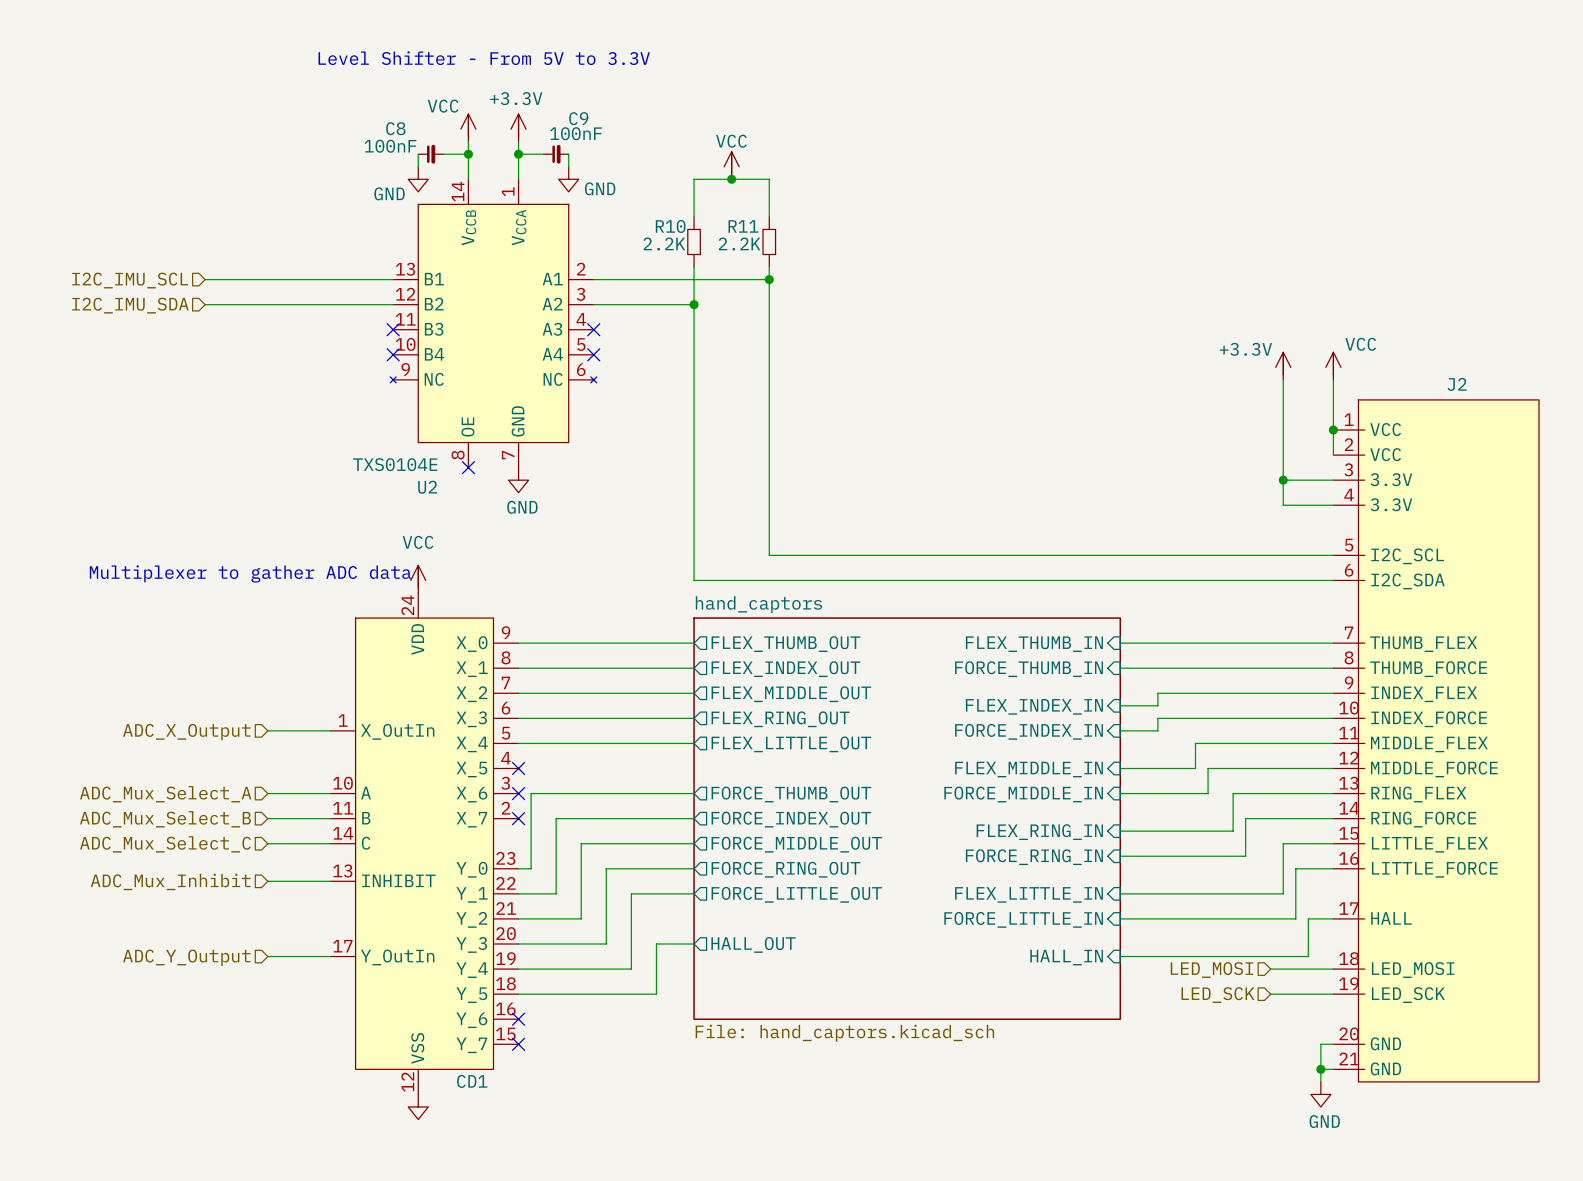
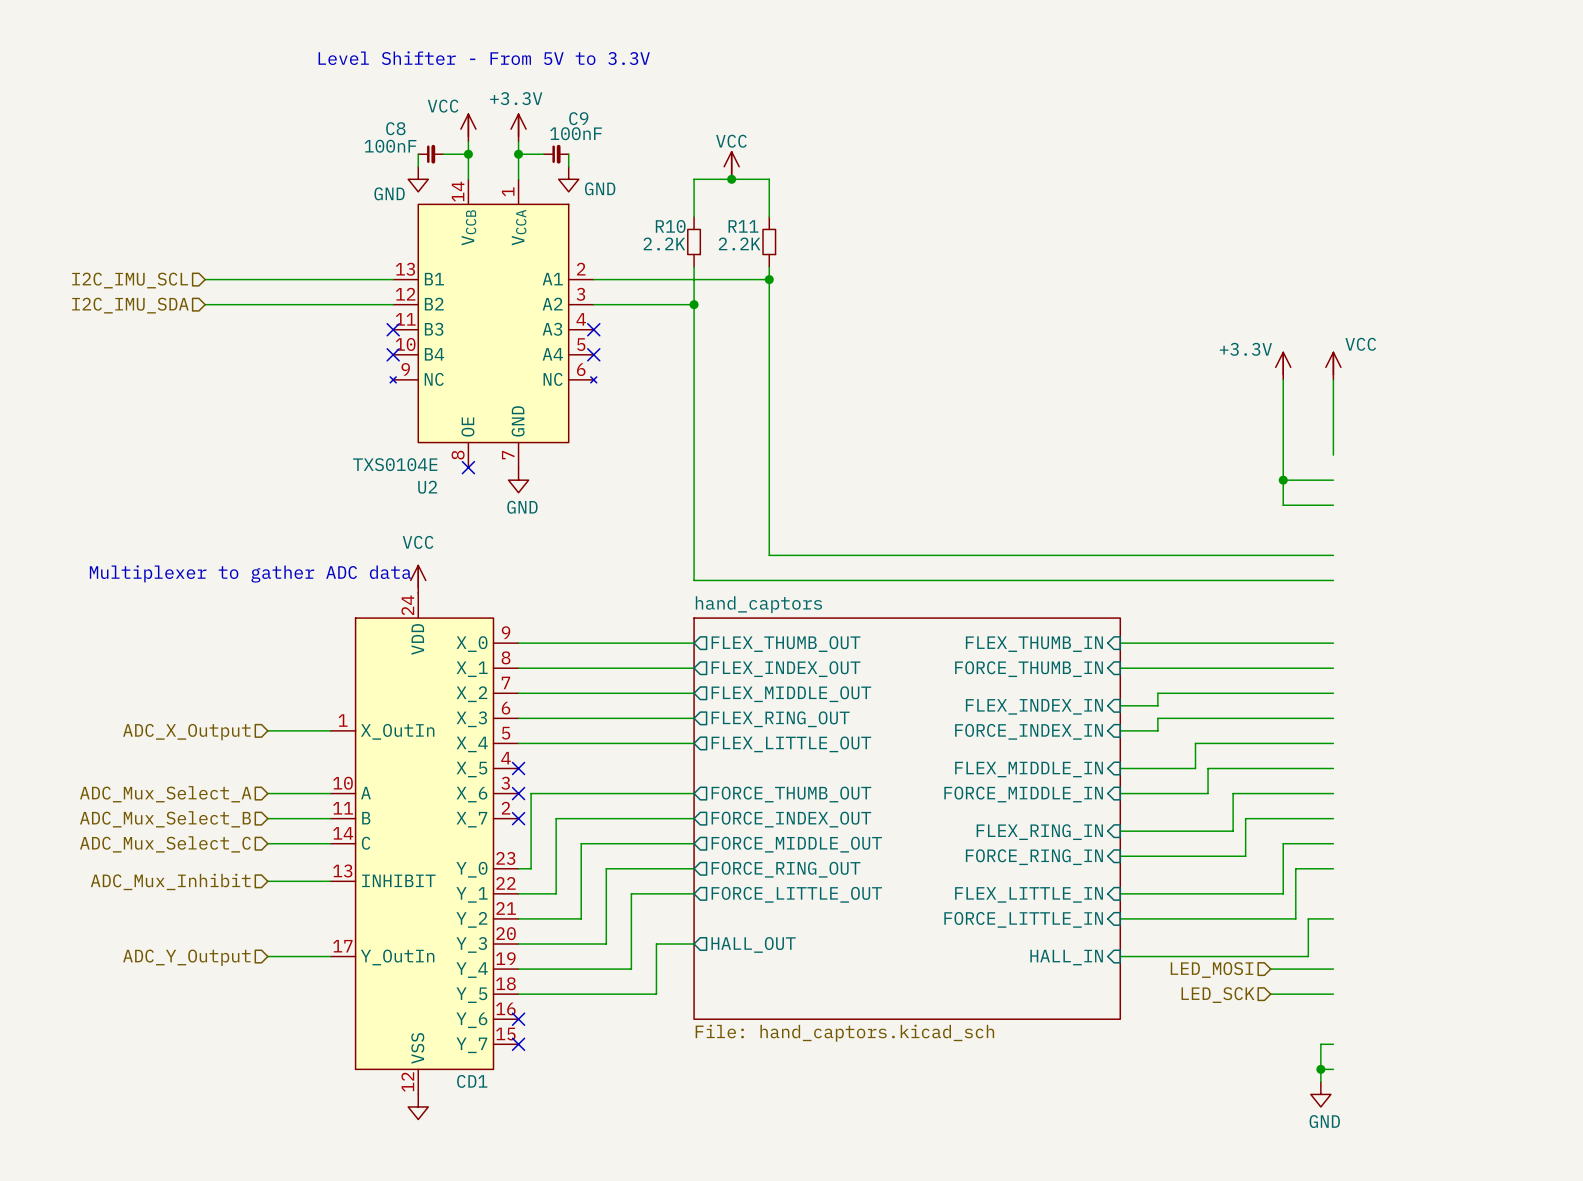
junction: (1333, 430) -> none
J2: (1436, 740) -> none

